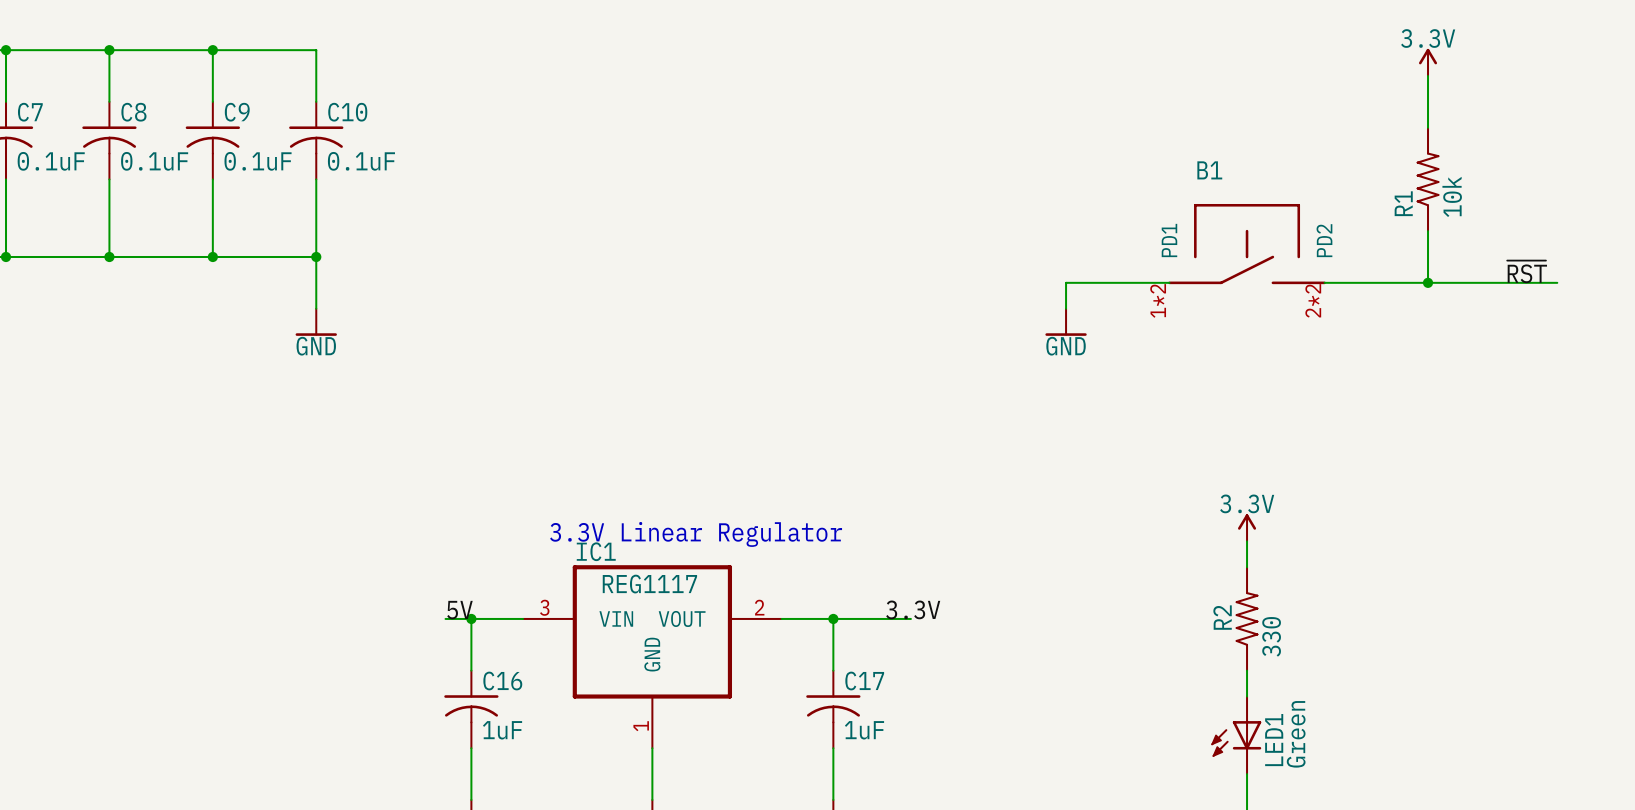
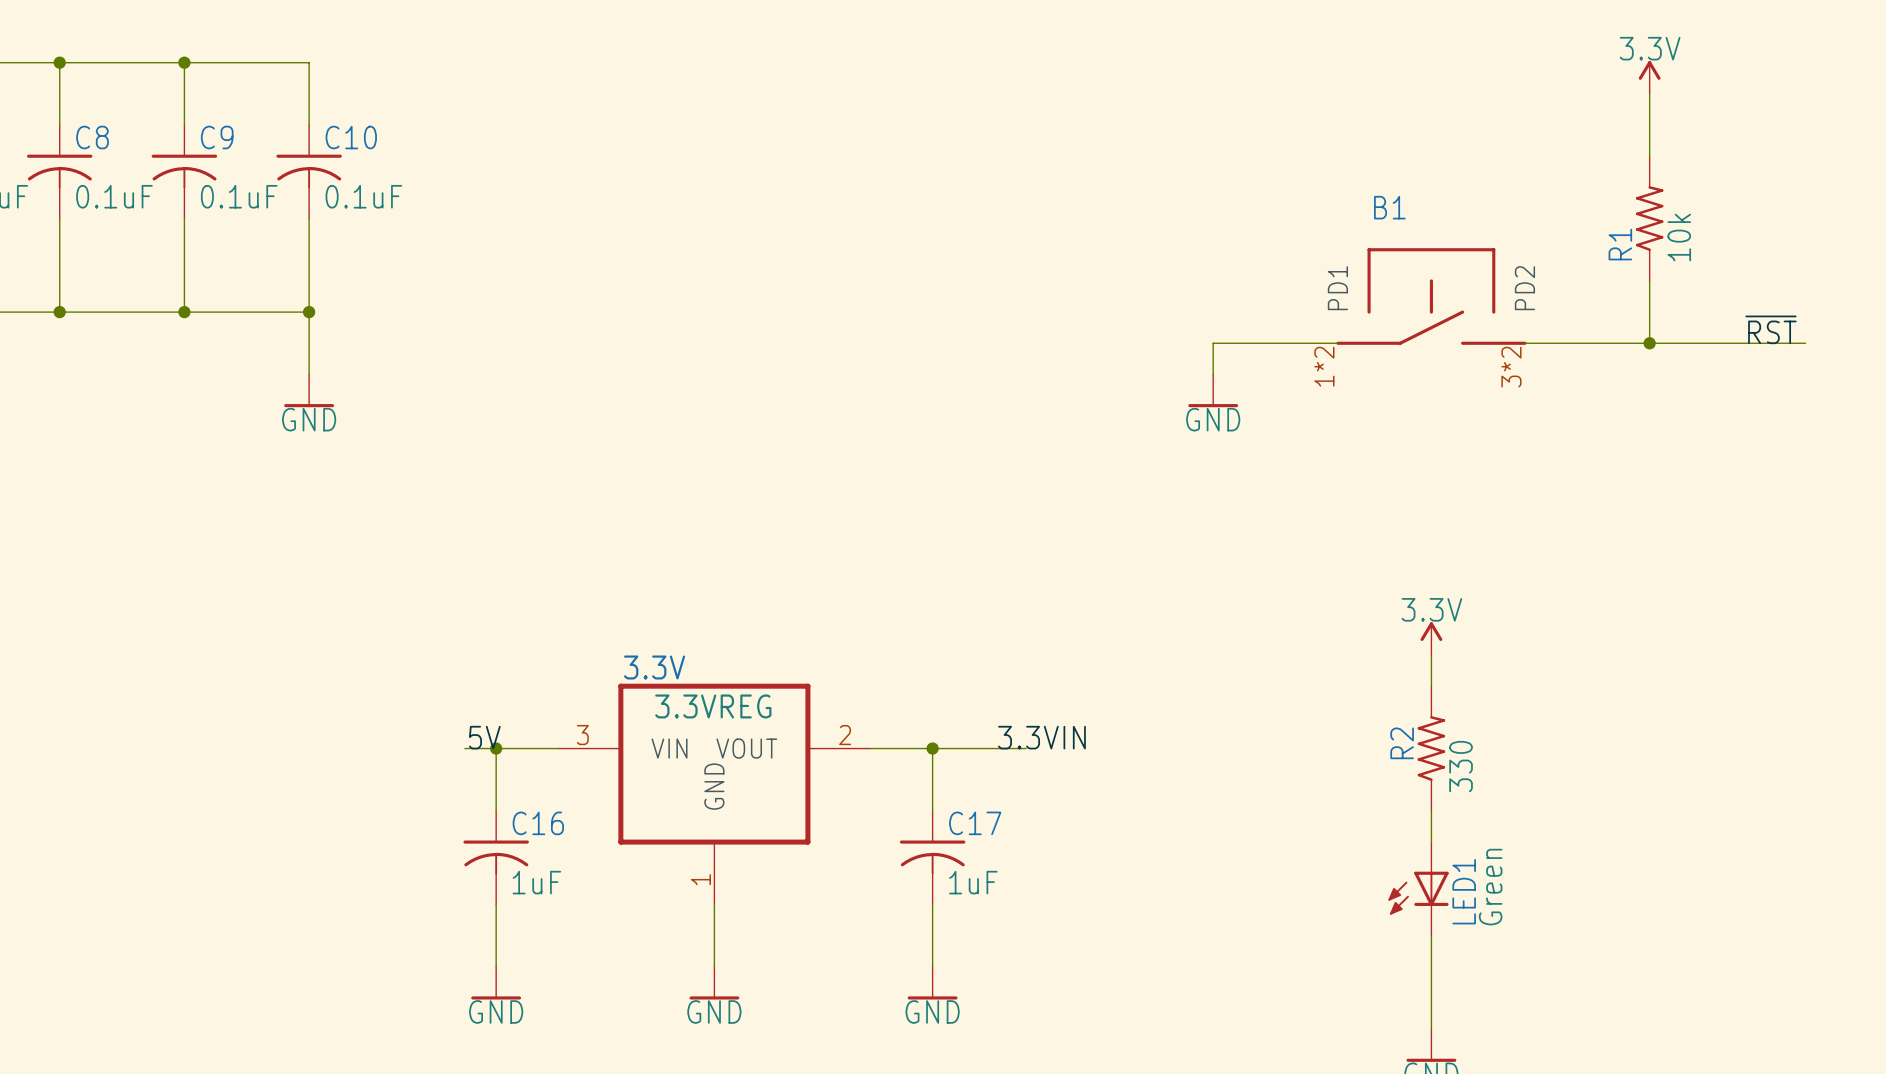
B1 pin number: 2*2 (1313, 300) -> 3*2 (1511, 367)
text: 3.3V Linear Regulator (696, 534) -> none
IC1 name: IC1 (596, 551) -> 3.3V (654, 667)
IC1 value: REG1117 (649, 584) -> 3.3VREG (713, 706)
label: 3.3V (913, 609) -> 3.3VIN (1041, 737)

